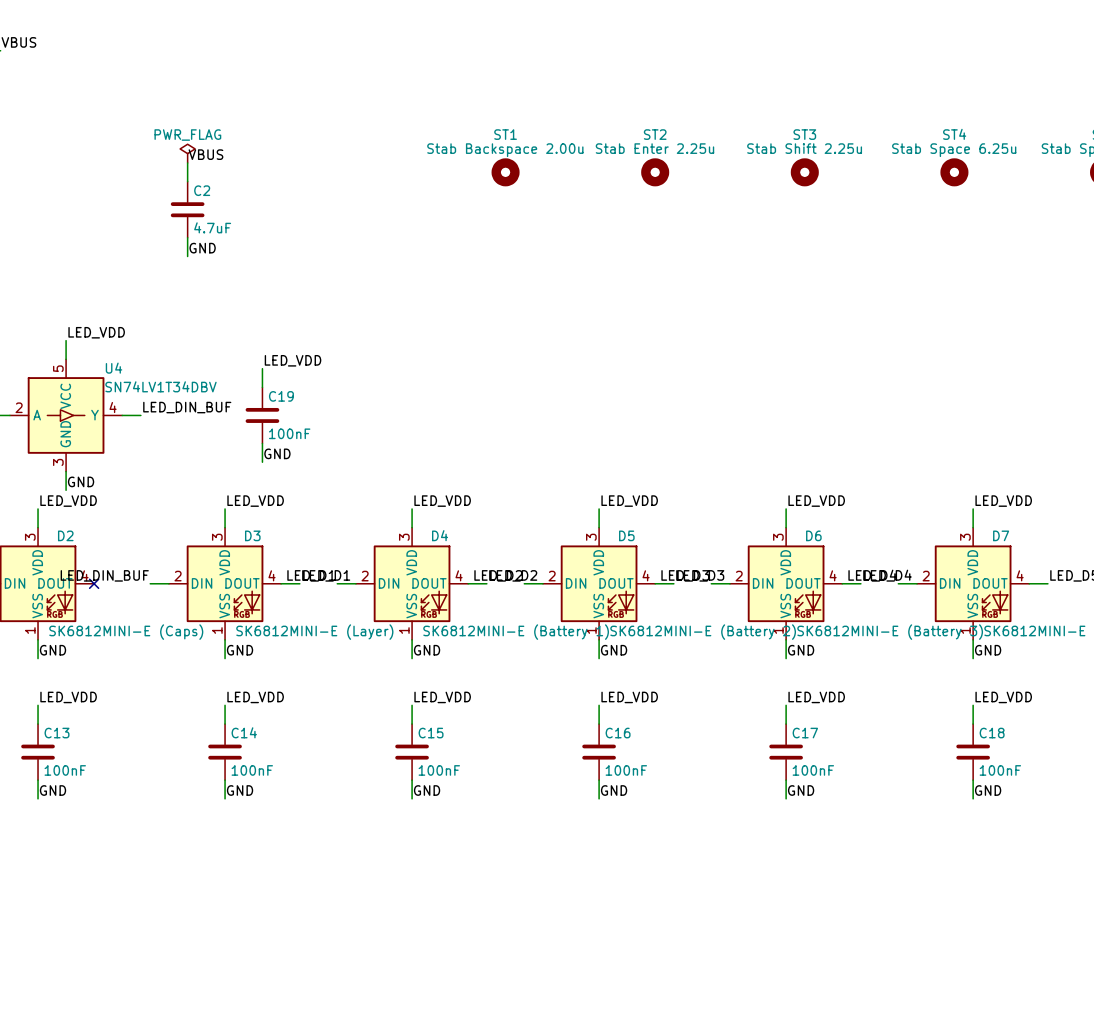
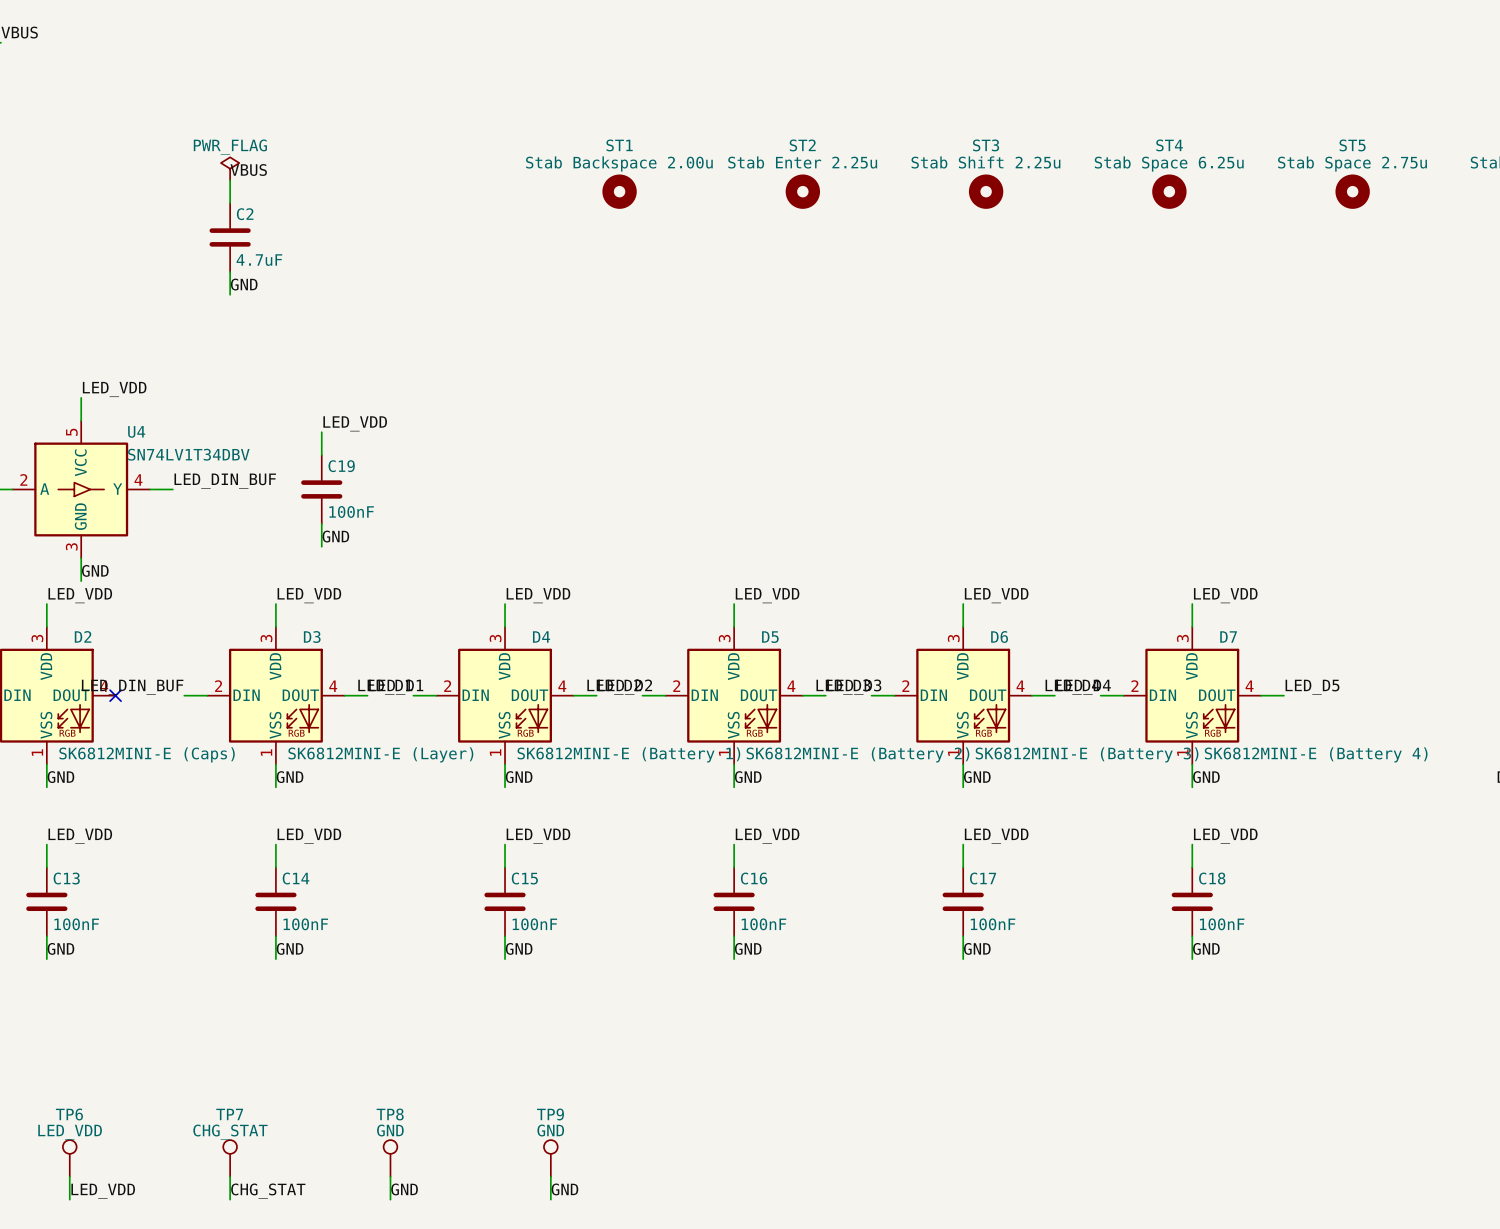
TP6: none -> LED_VDD (69, 1158)
TP7: none -> CHG_STAT (230, 1158)
TP8: none -> GND (390, 1158)
TP9: none -> GND (550, 1158)
wire: none -> (69, 1176) (69, 1199)
wire: none -> (230, 1176) (230, 1199)
wire: none -> (390, 1176) (390, 1199)
wire: none -> (550, 1176) (550, 1199)
label: none -> GND (404, 1189)
label: none -> GND (564, 1189)
label: none -> LED_VDD (103, 1191)
label: none -> CHG_STAT (268, 1191)

